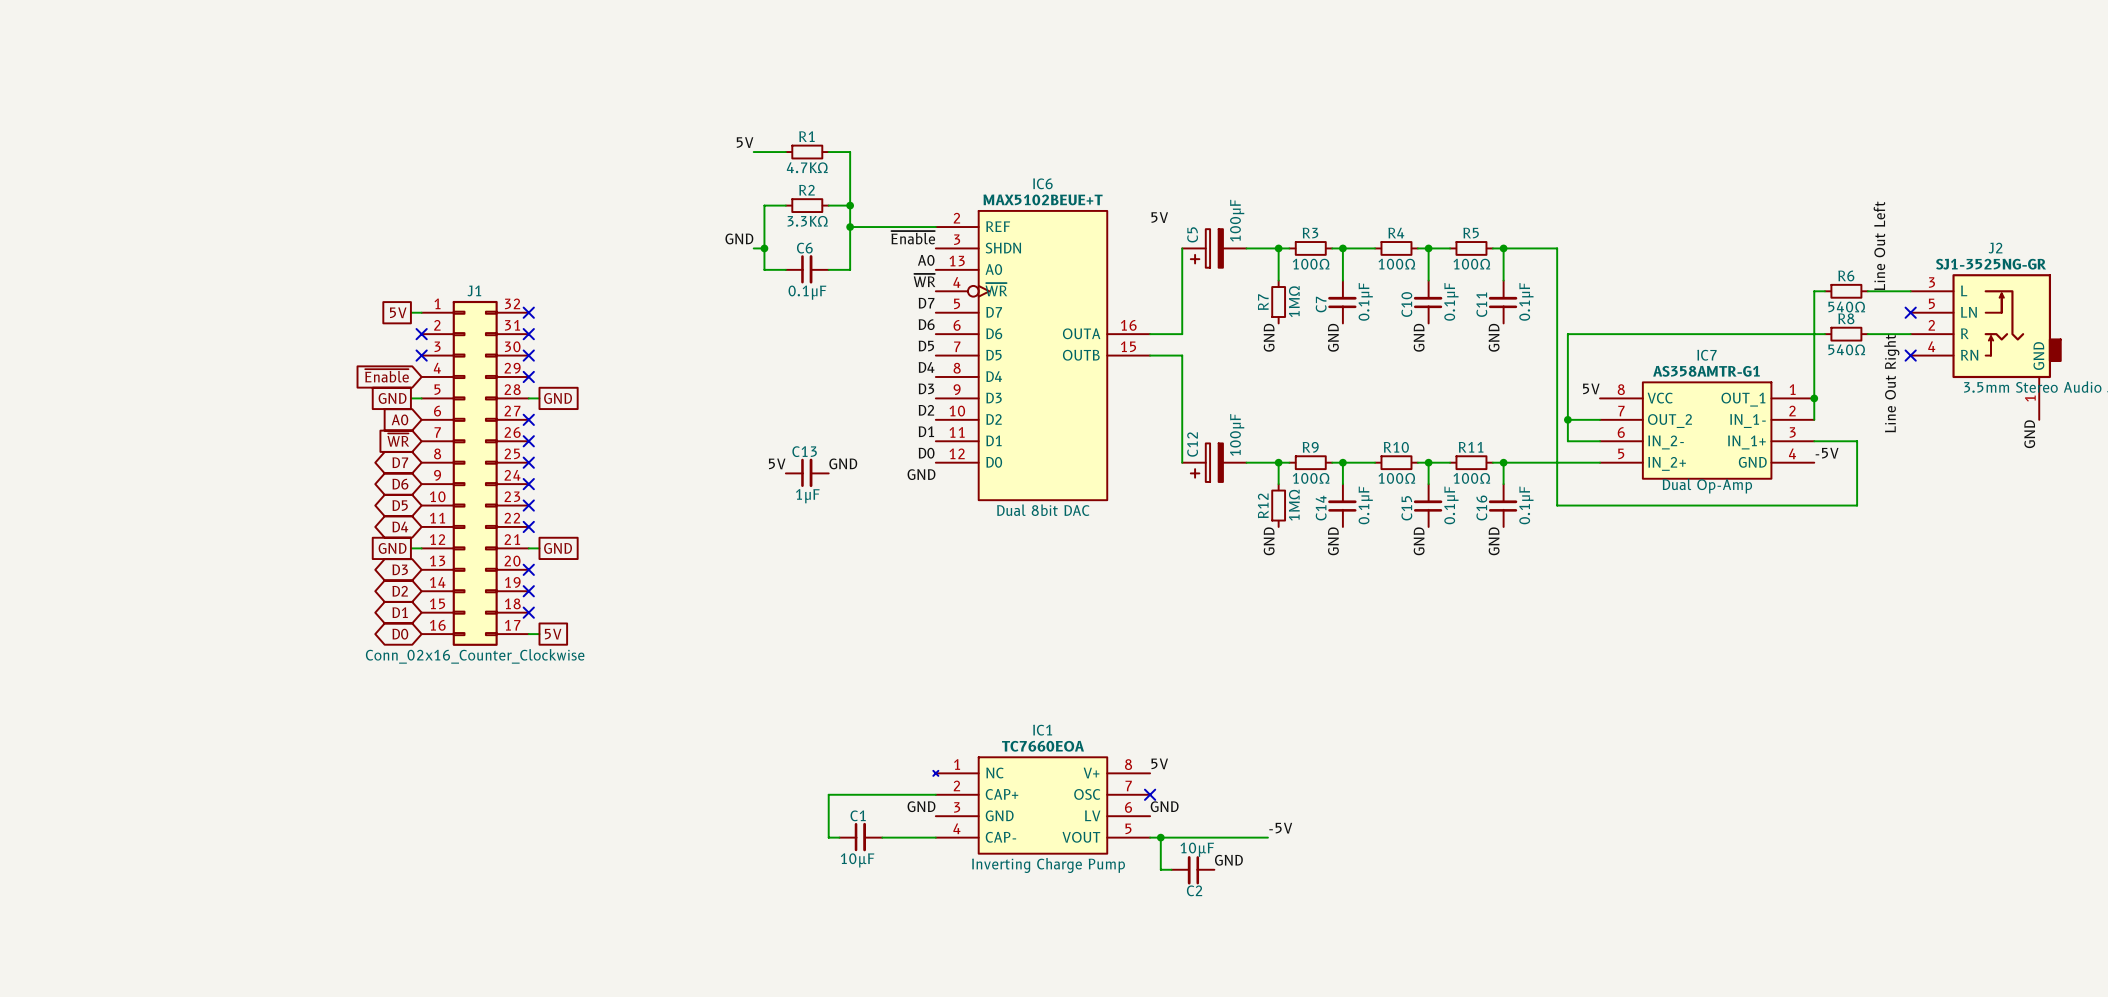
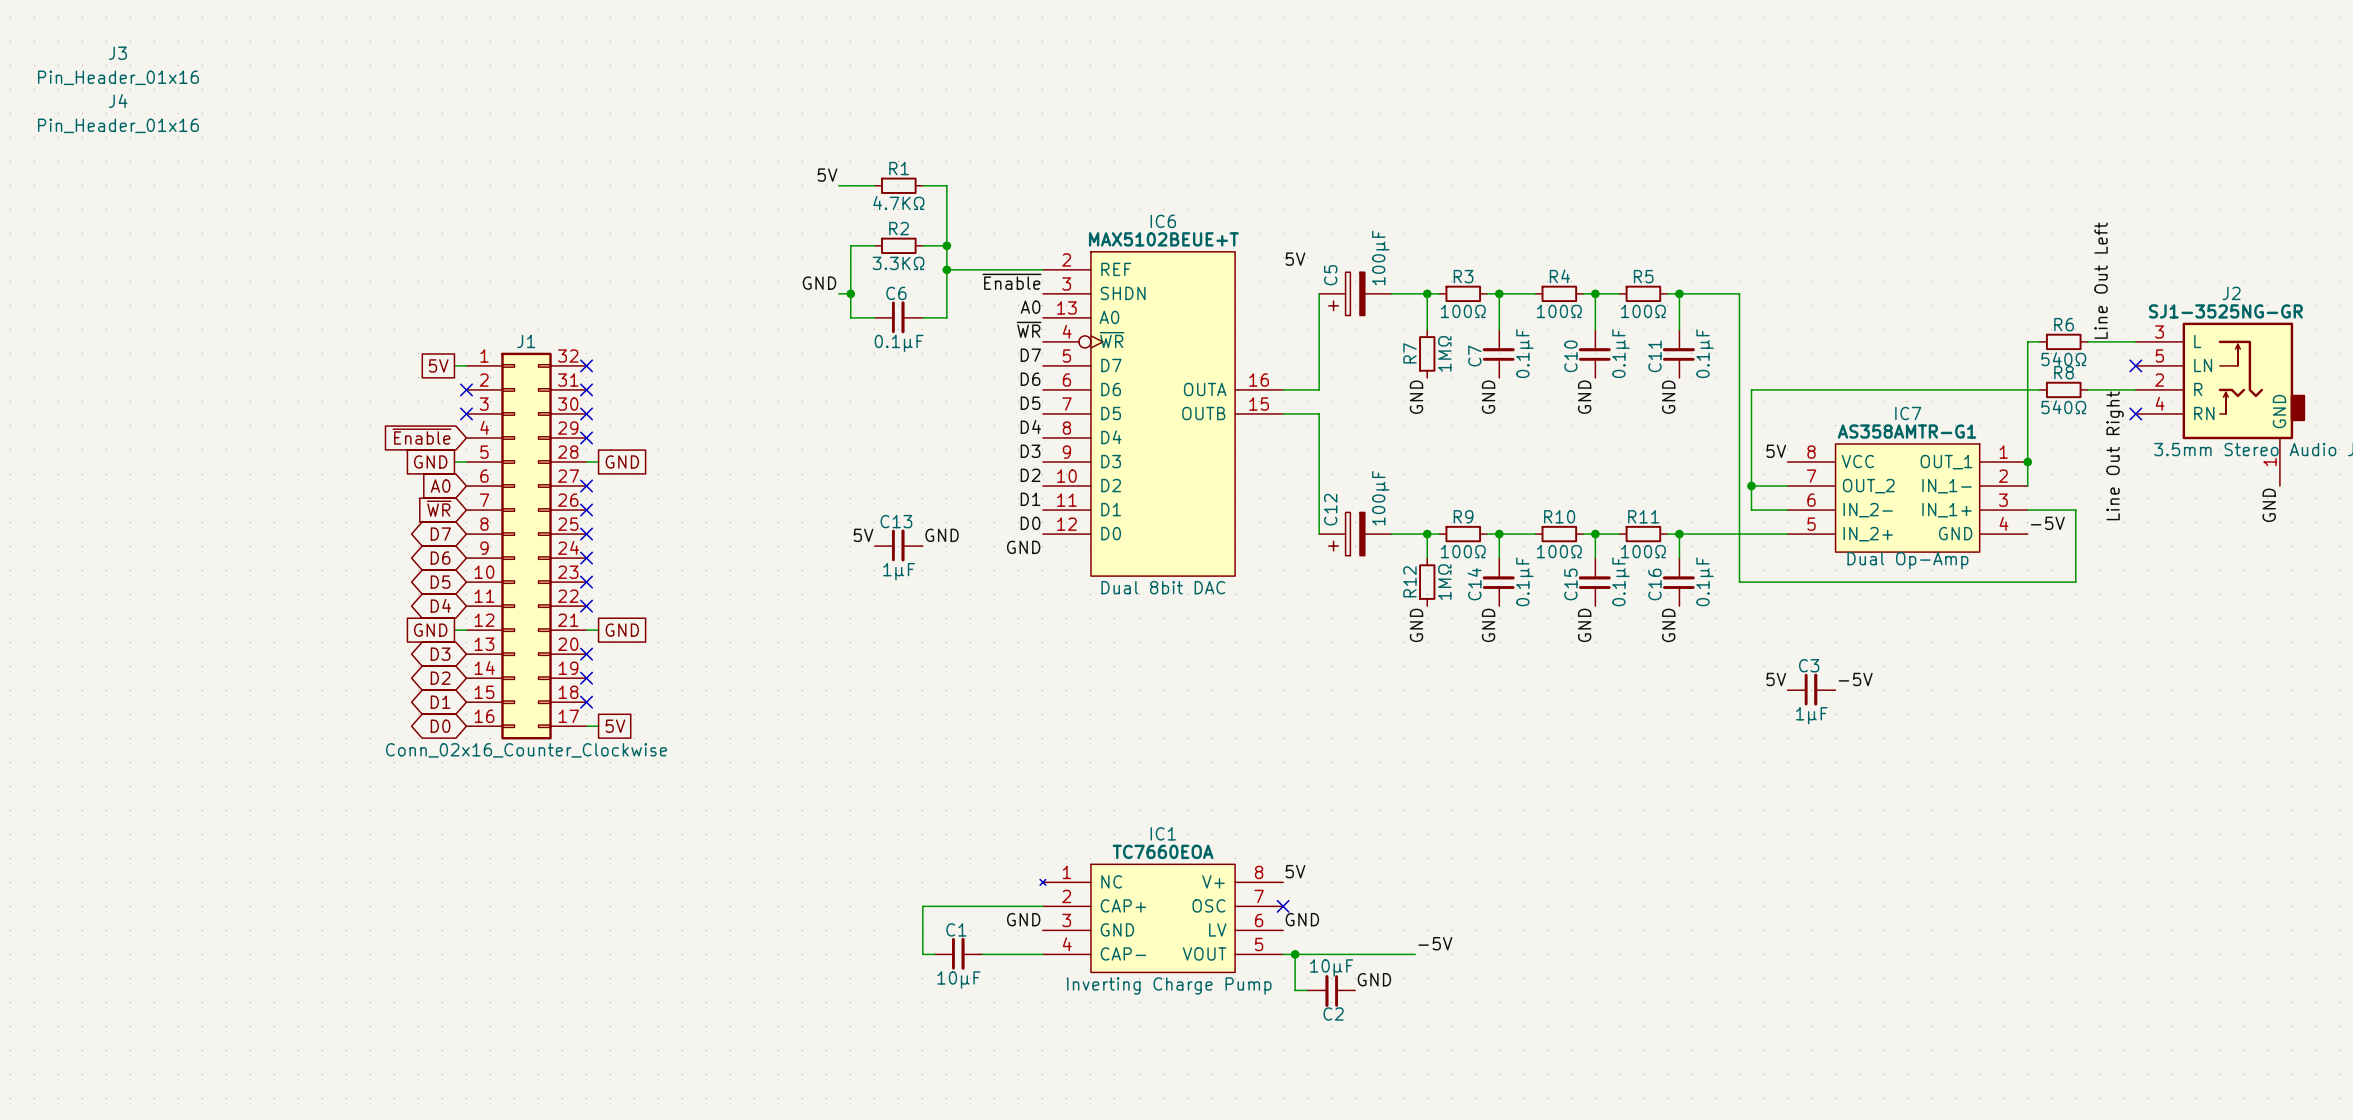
J3: none -> Pin_Header_01x16 (118, 65)
J4: none -> Pin_Header_01x16 (118, 113)
label: none -> 5V (1776, 679)
label: none -> -5V (1855, 679)
C3: none -> 1μF (1811, 689)

